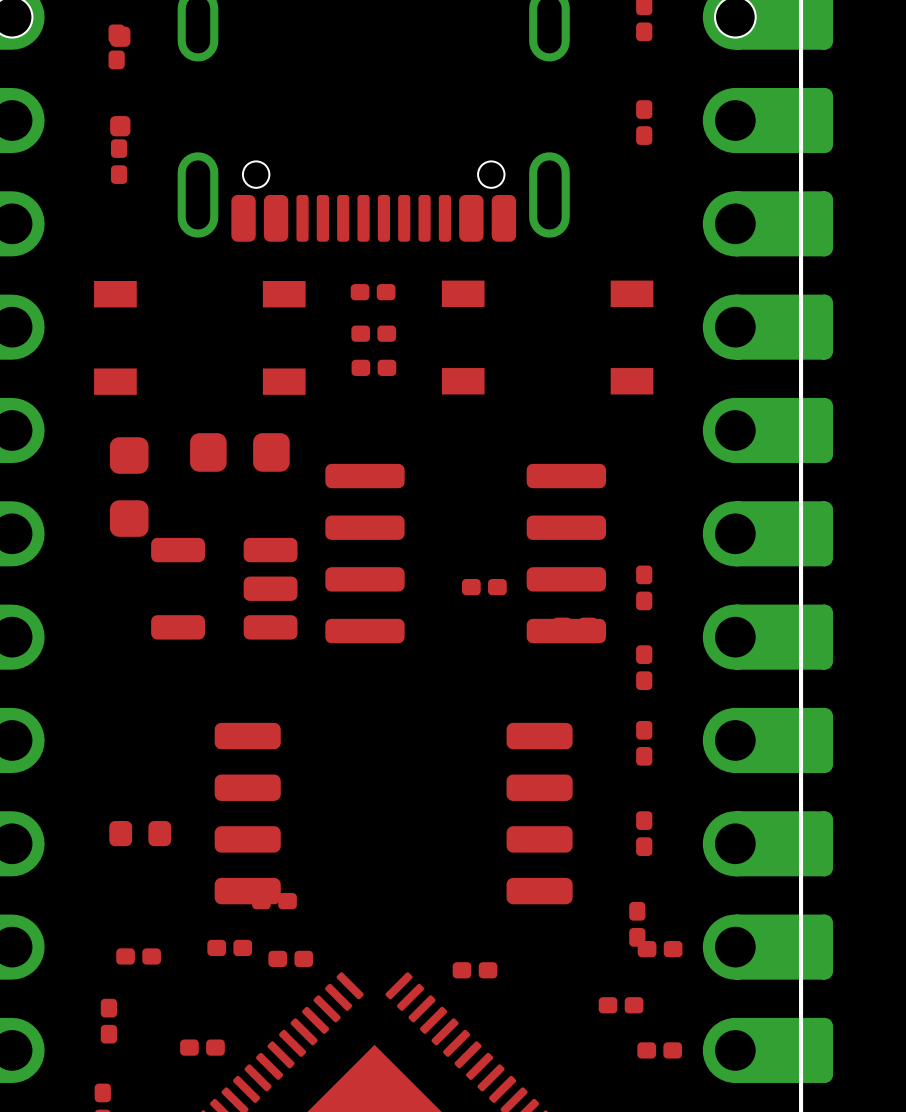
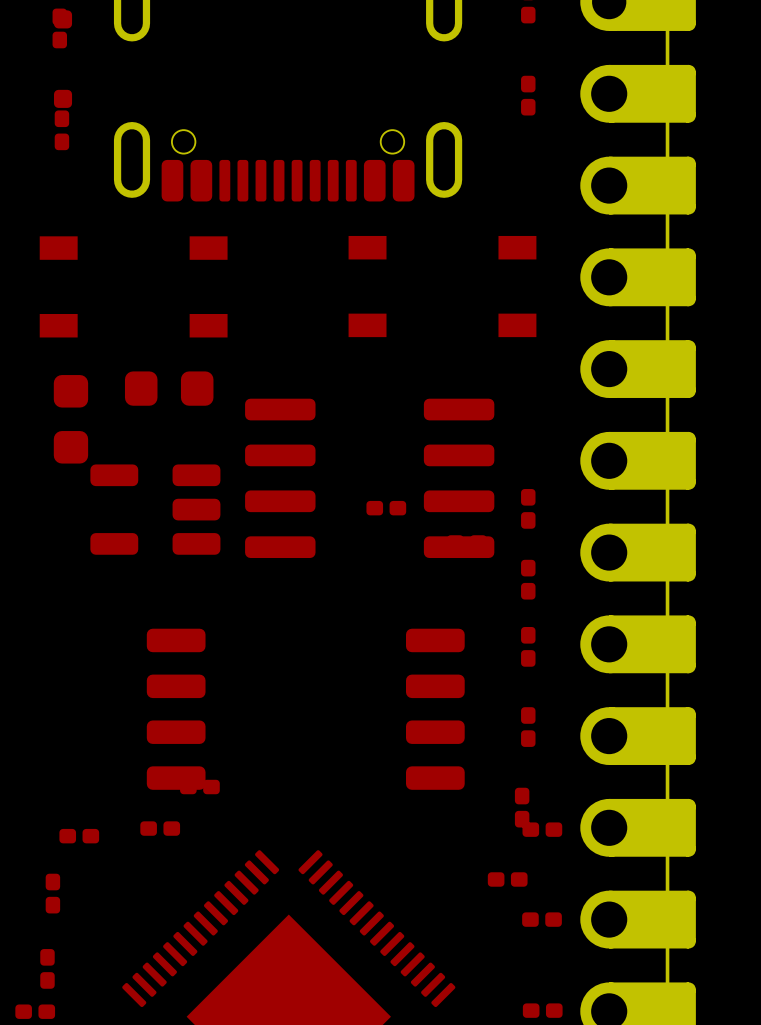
part: (373, 292) -> none
part: (373, 333) -> none
part: (373, 367) -> none
part: (140, 833) -> none
part: (290, 958) -> none
part: (475, 970) -> none
part: (202, 1047) -> none

